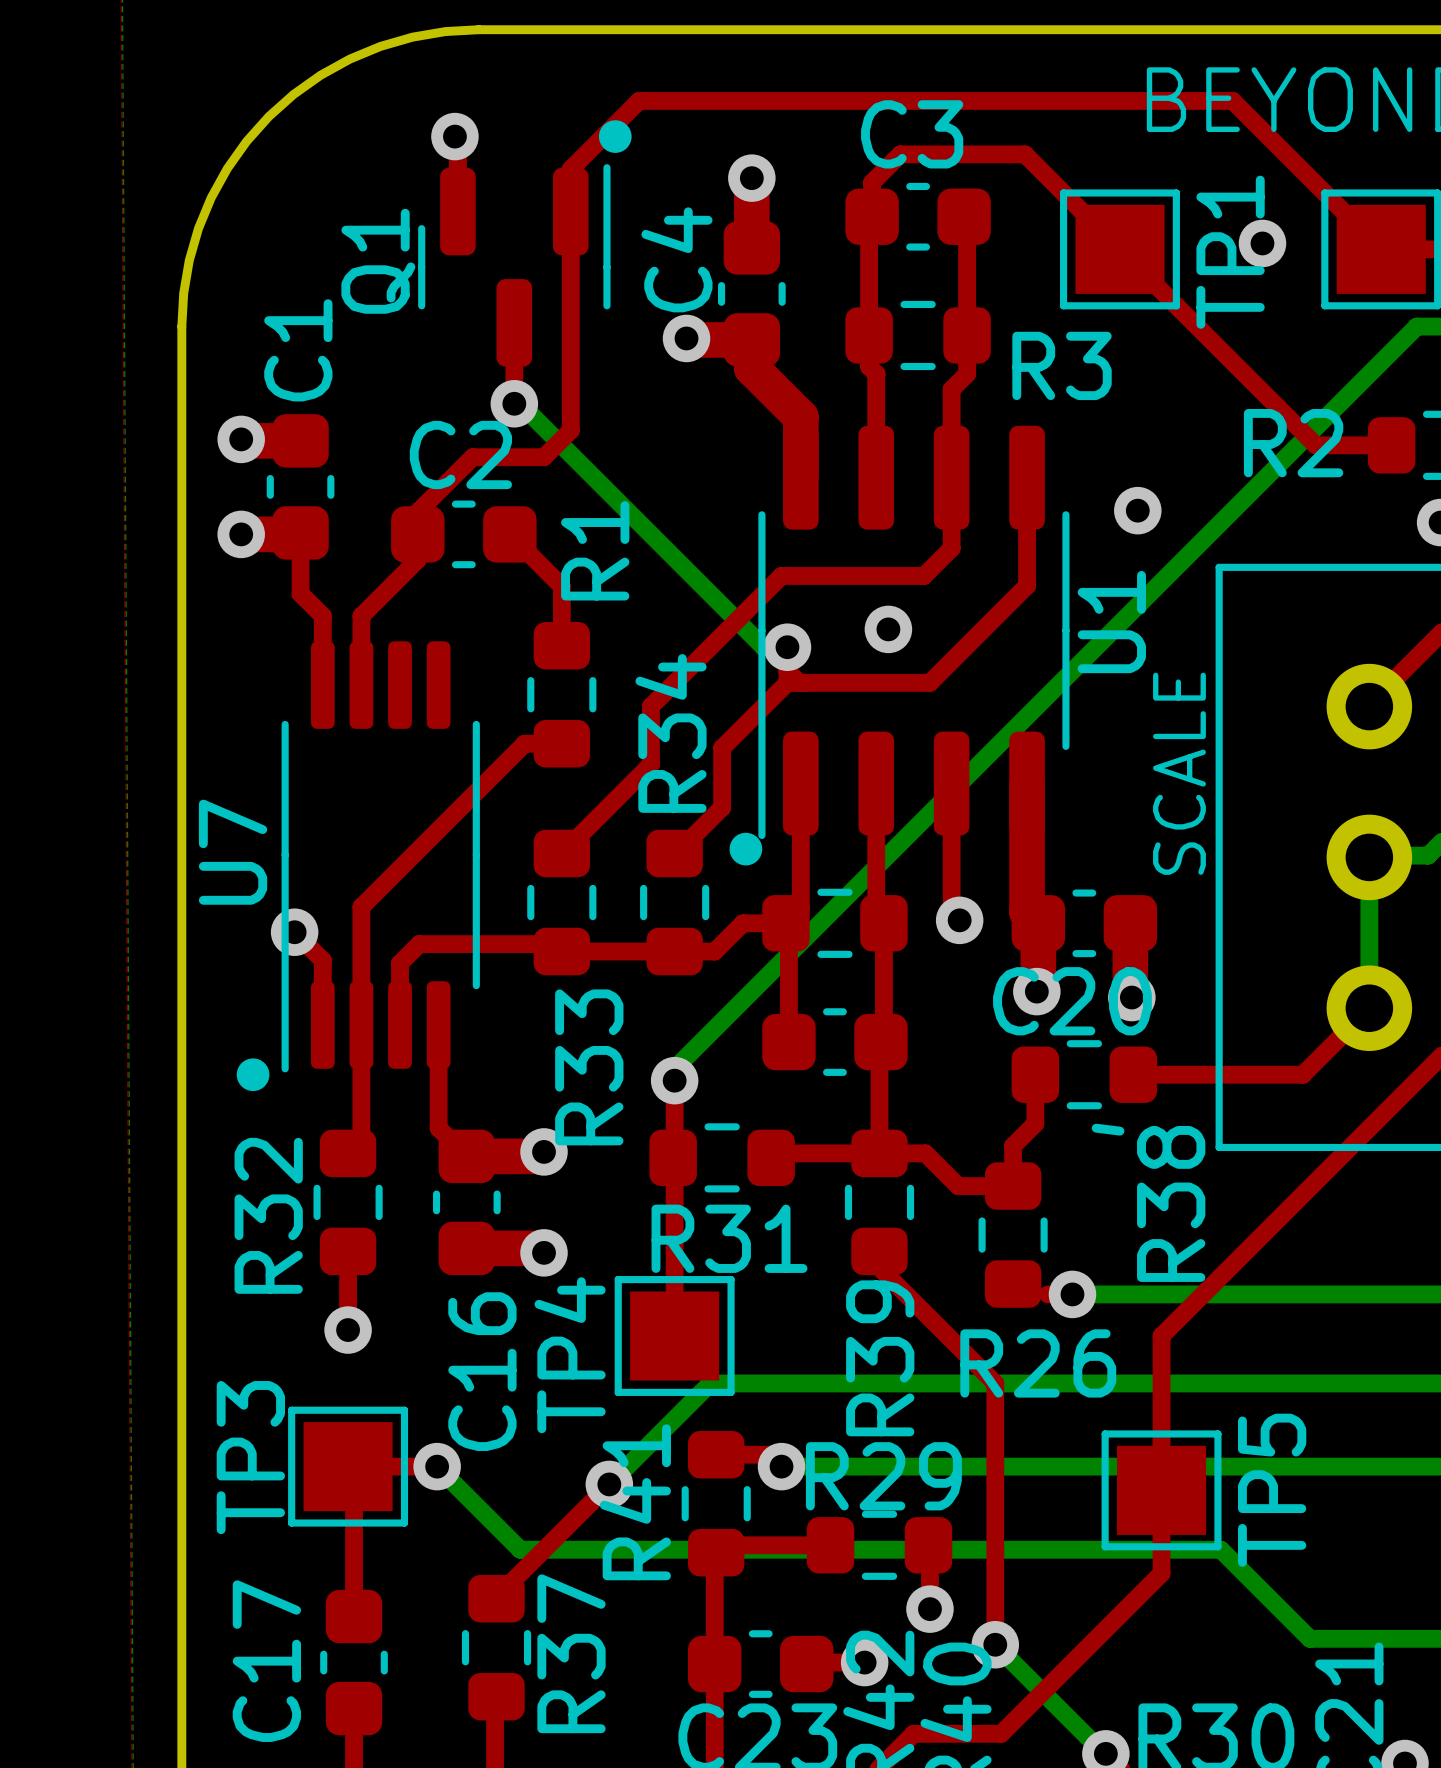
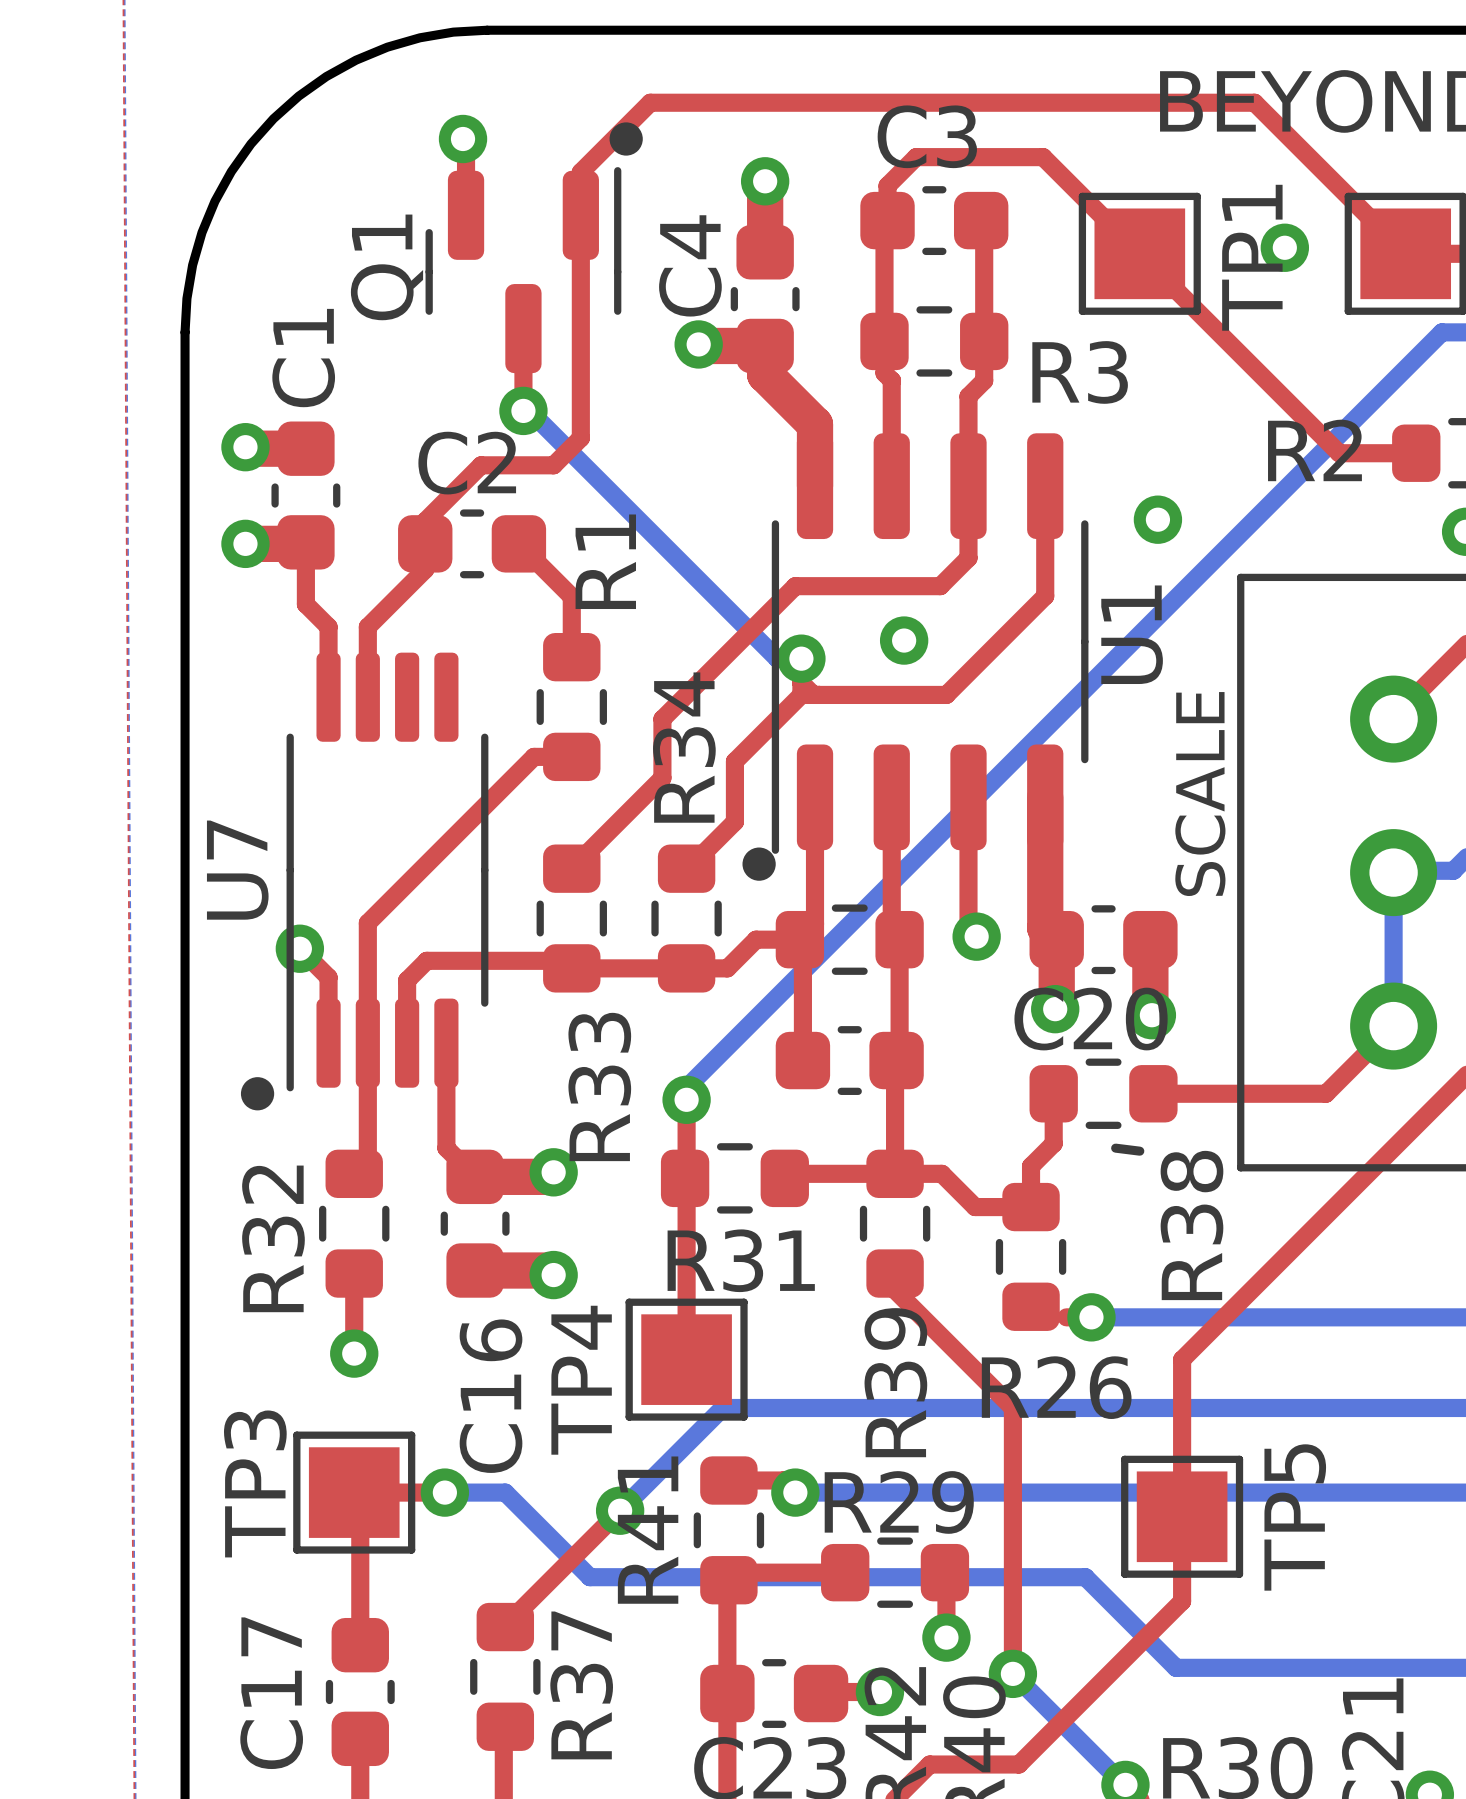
bottom track: (437, 1466) (520, 1549) (579, 1549) -> (444, 1492) (505, 1492) (589, 1577)
bottom track: (1066, 1549) (1220, 1549) (1309, 1638) -> (1085, 1577) (1176, 1667) (1333, 1667)

